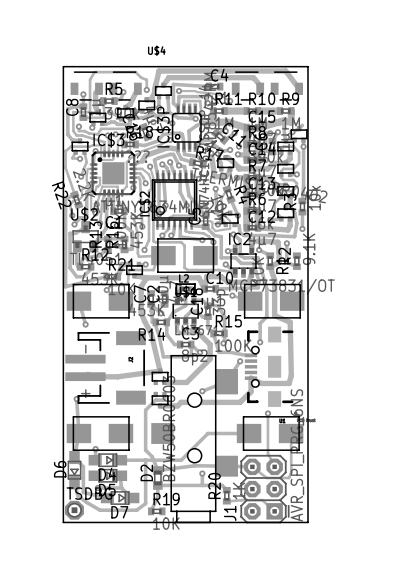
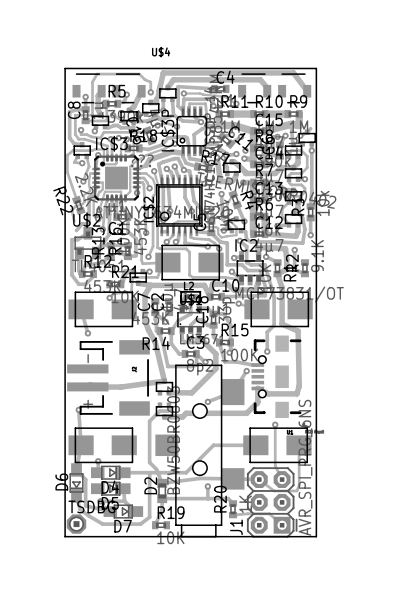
track: (74, 194) (65, 198) (65, 286) (106, 276) -> none
via: (72, 215) -> none
via: (74, 224) -> none

